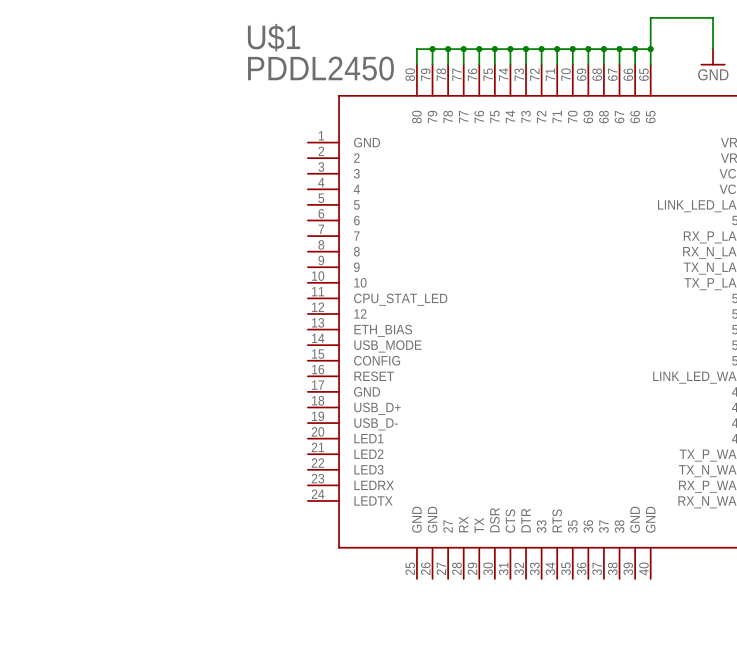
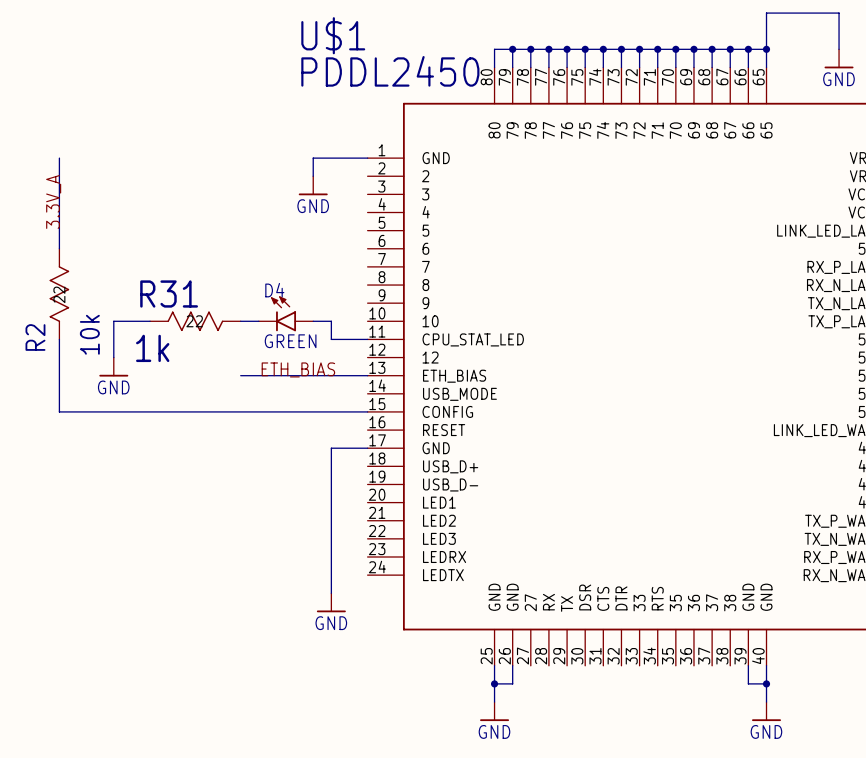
wire: none -> (59, 158) (59, 248)
wire: none -> (367, 158) (313, 158) (313, 176)
power symbol: none -> GND (313, 185)
label: none -> 3.3V_A (53, 201)
R2: none -> 10k (59, 294)
D4: none -> GREEN (286, 313)
wire: none -> (150, 321) (113, 321) (113, 357)
R31: none -> 1k (195, 321)
wire: none -> (240, 321) (258, 321)
wire: none -> (313, 321) (331, 321) (331, 339) (367, 339)
wire: none -> (59, 339) (59, 411) (367, 411)
power symbol: none -> GND (113, 367)
label: none -> ETH_BIAS (298, 369)
wire: none -> (240, 375) (367, 375)
wire: none -> (367, 448) (331, 448) (331, 593)
power symbol: none -> GND (331, 602)
wire: none -> (494, 665) (494, 702)
wire: none -> (512, 665) (512, 683) (494, 683)
wire: none -> (748, 665) (748, 683) (766, 683)
wire: none -> (766, 665) (766, 702)
junction: none -> (494, 683)
junction: none -> (766, 683)
power symbol: none -> GND (494, 711)
power symbol: none -> GND (766, 711)

